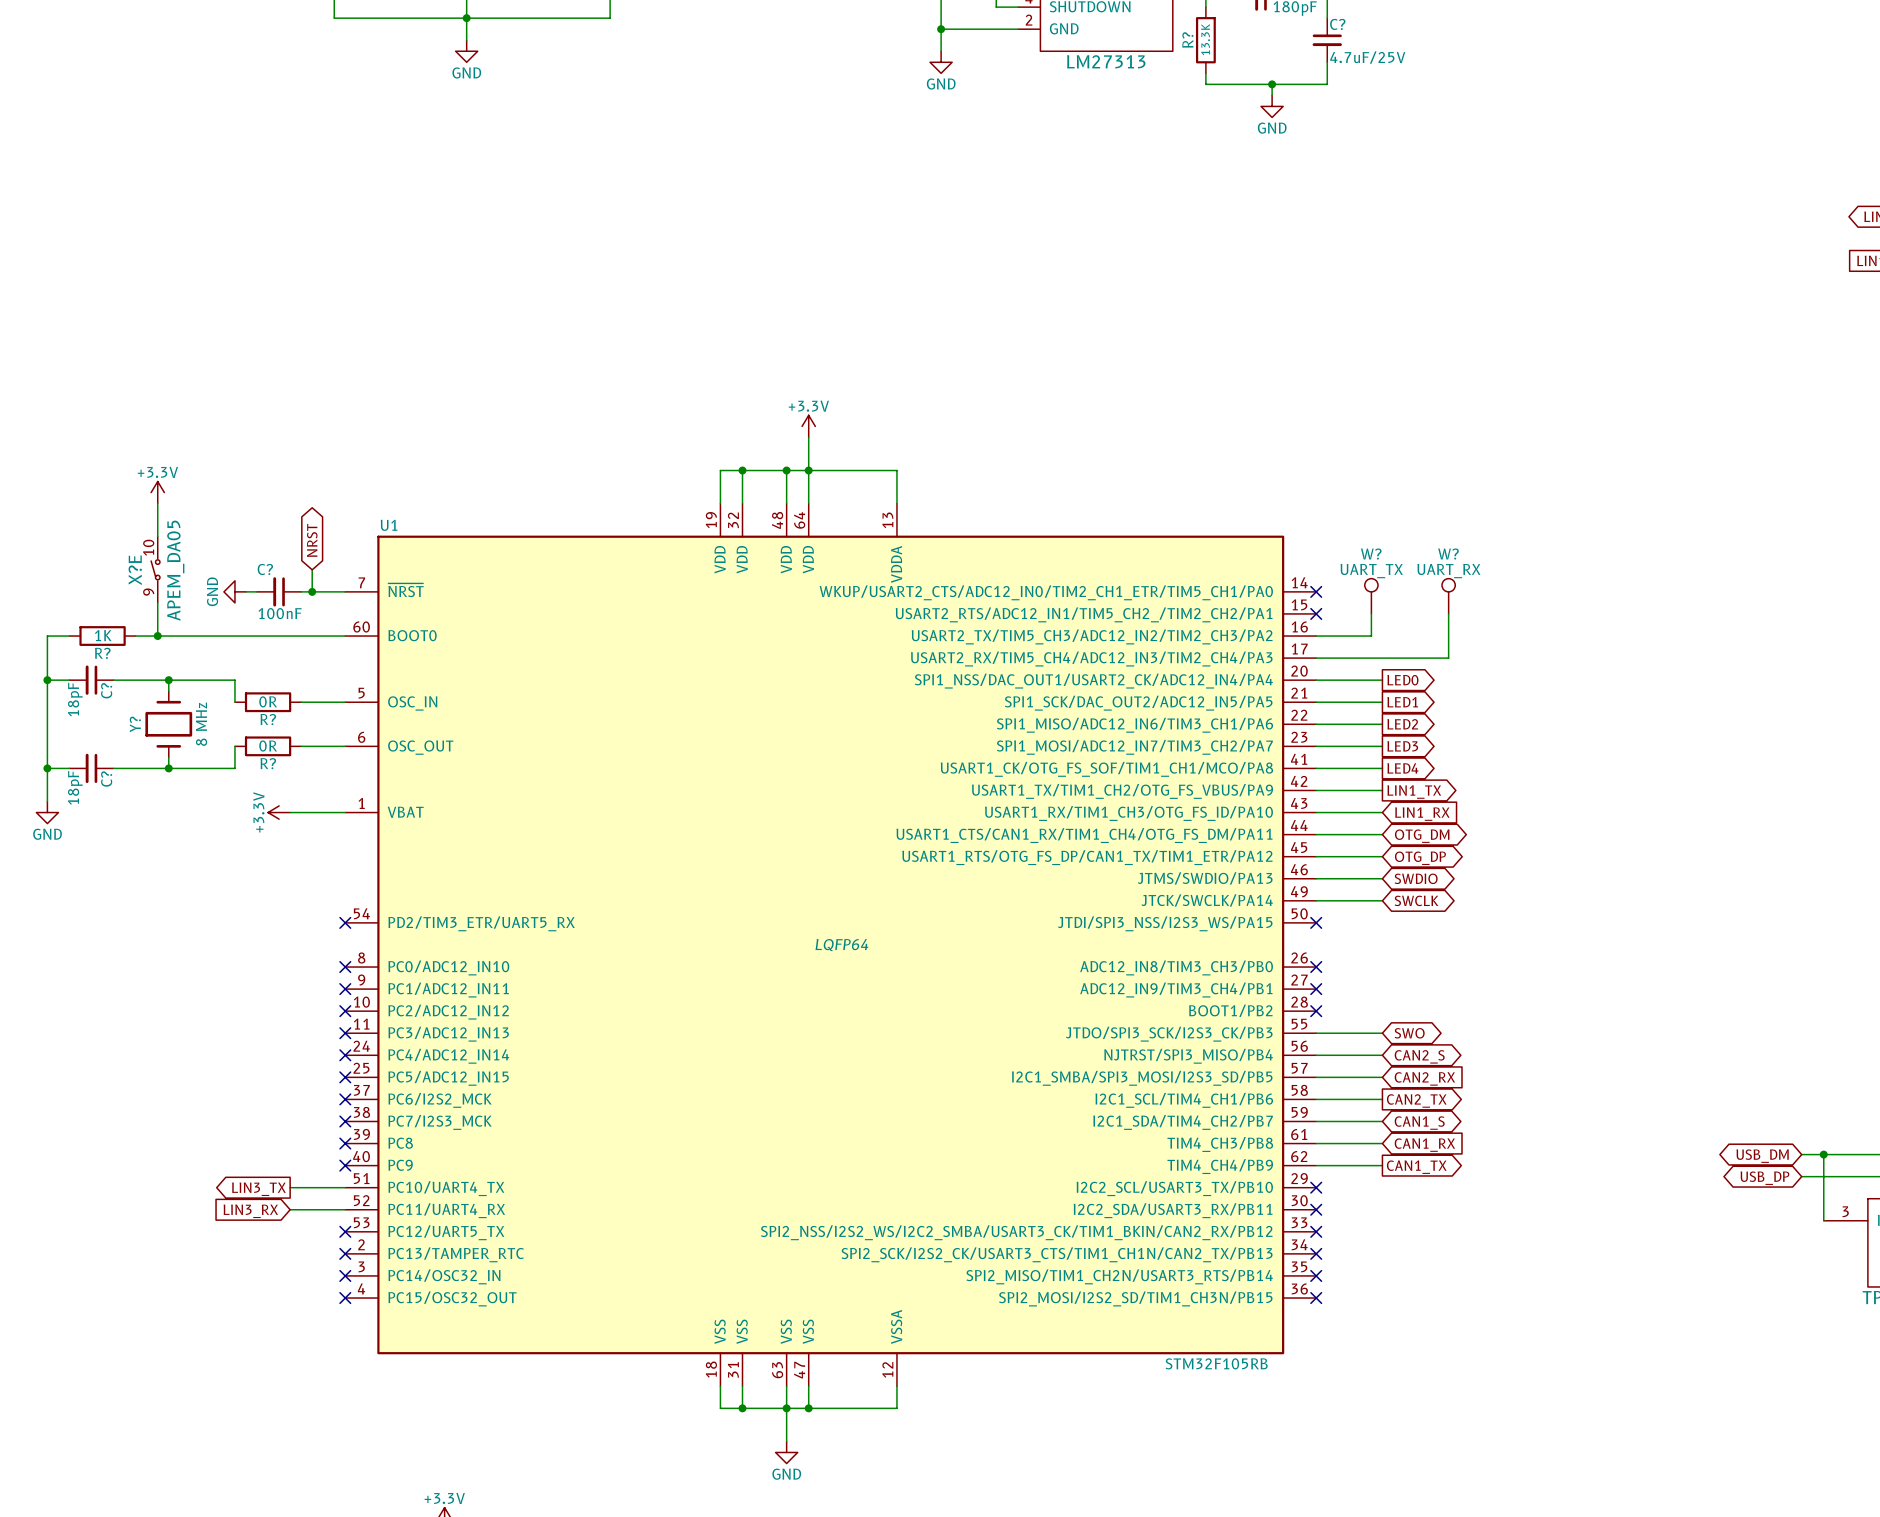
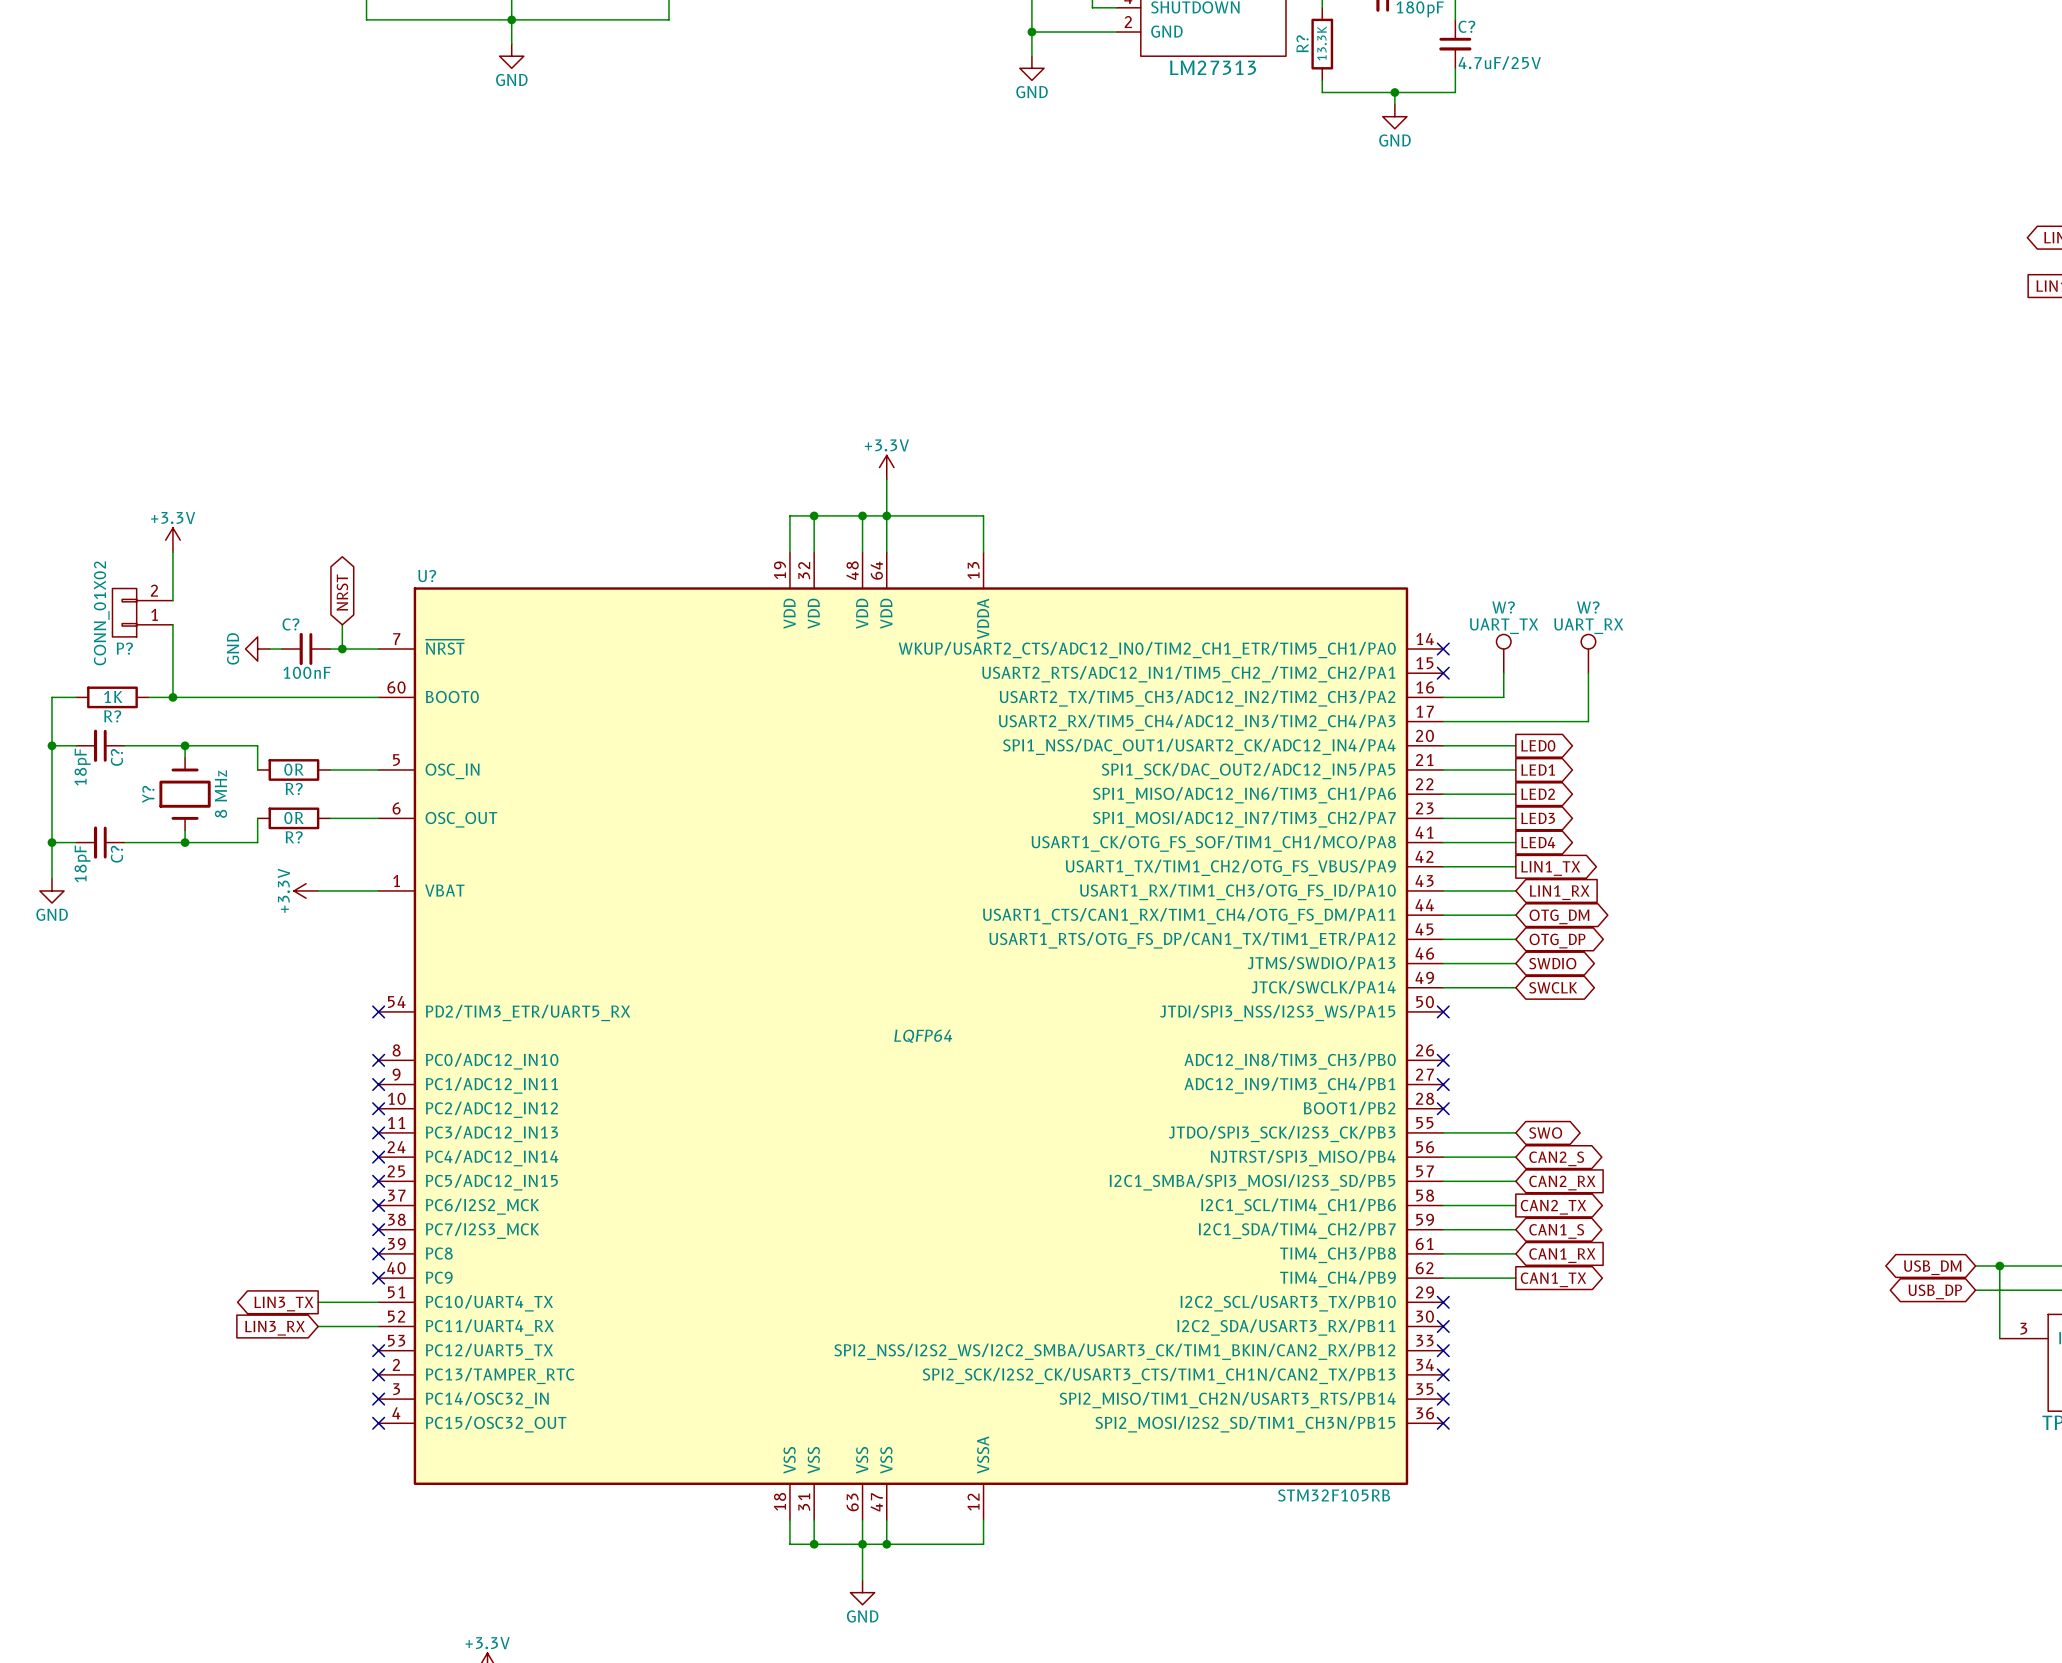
U1 name: U1 (389, 525) -> U? (427, 576)
P?: none -> CONN_01X02 (142, 612)
X?E: APEM_DA05 (155, 569) -> none

